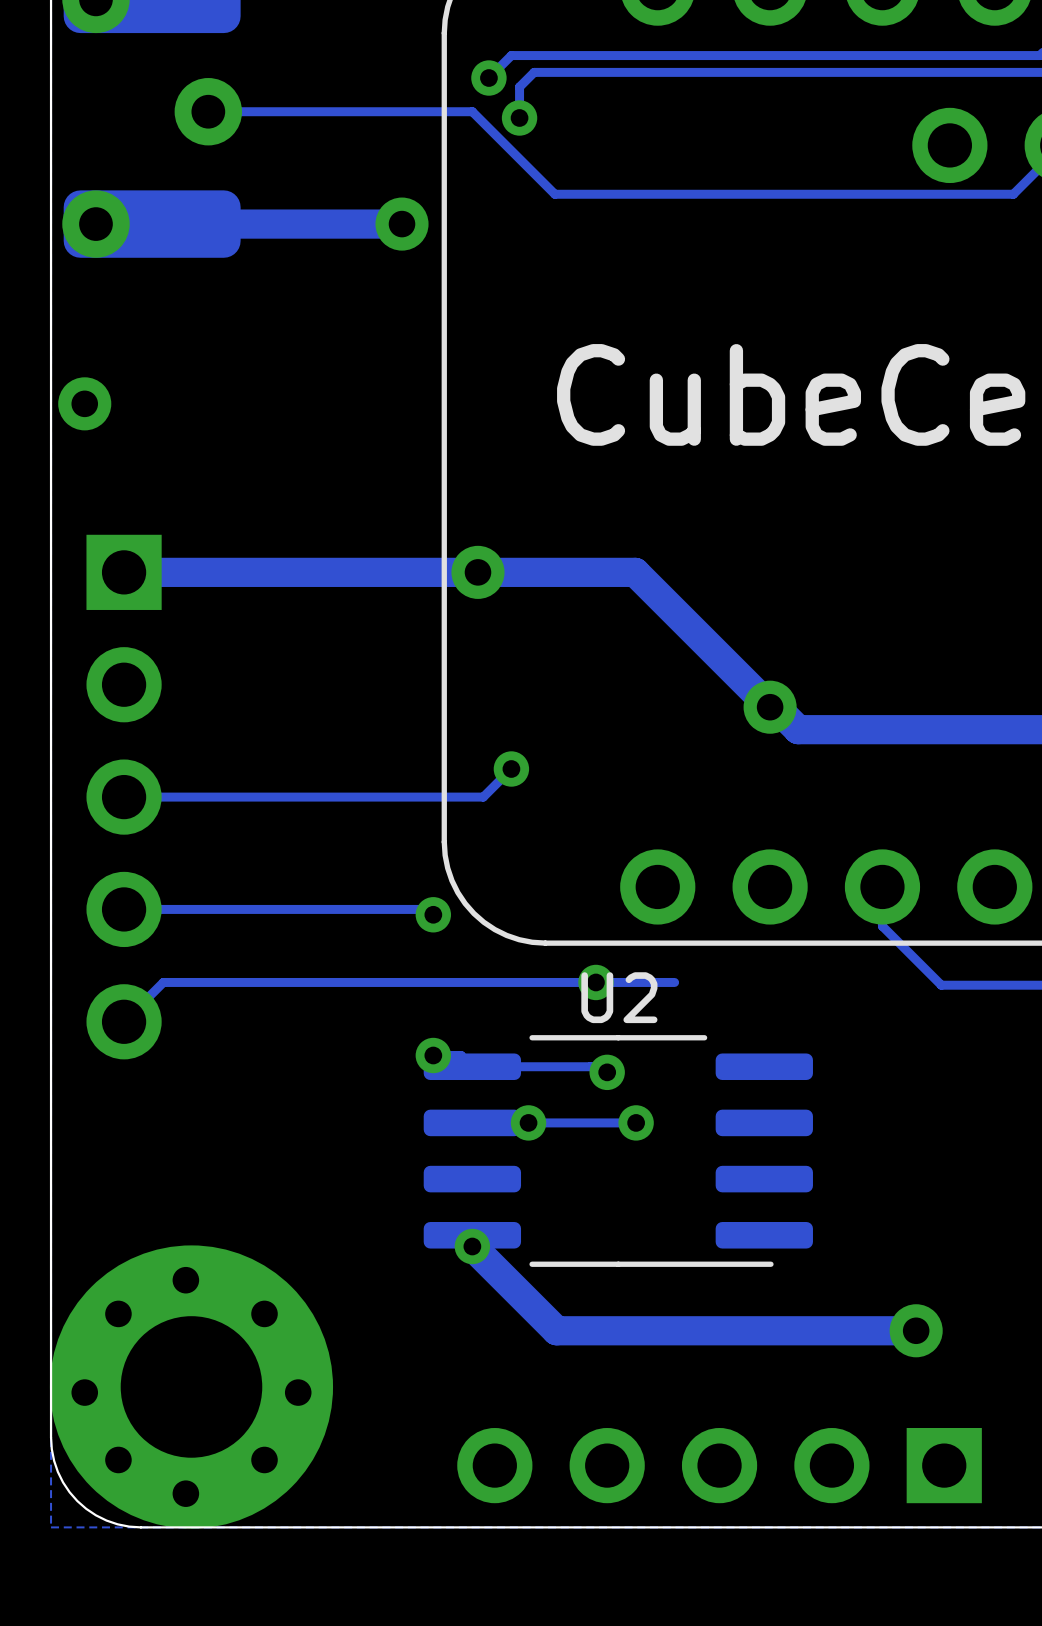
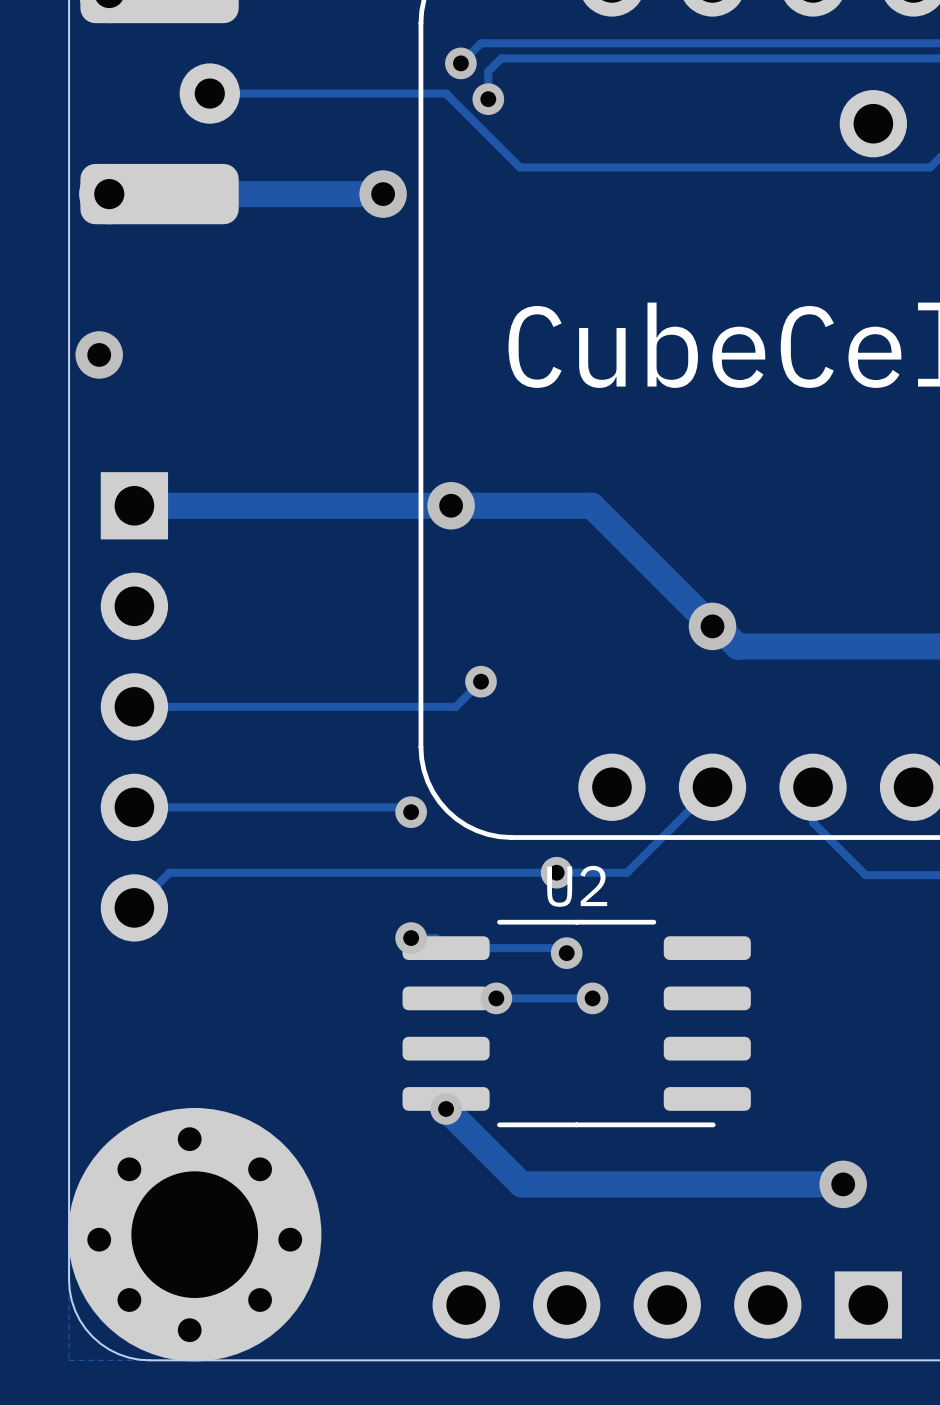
track: none -> (712, 787) (627, 872)

